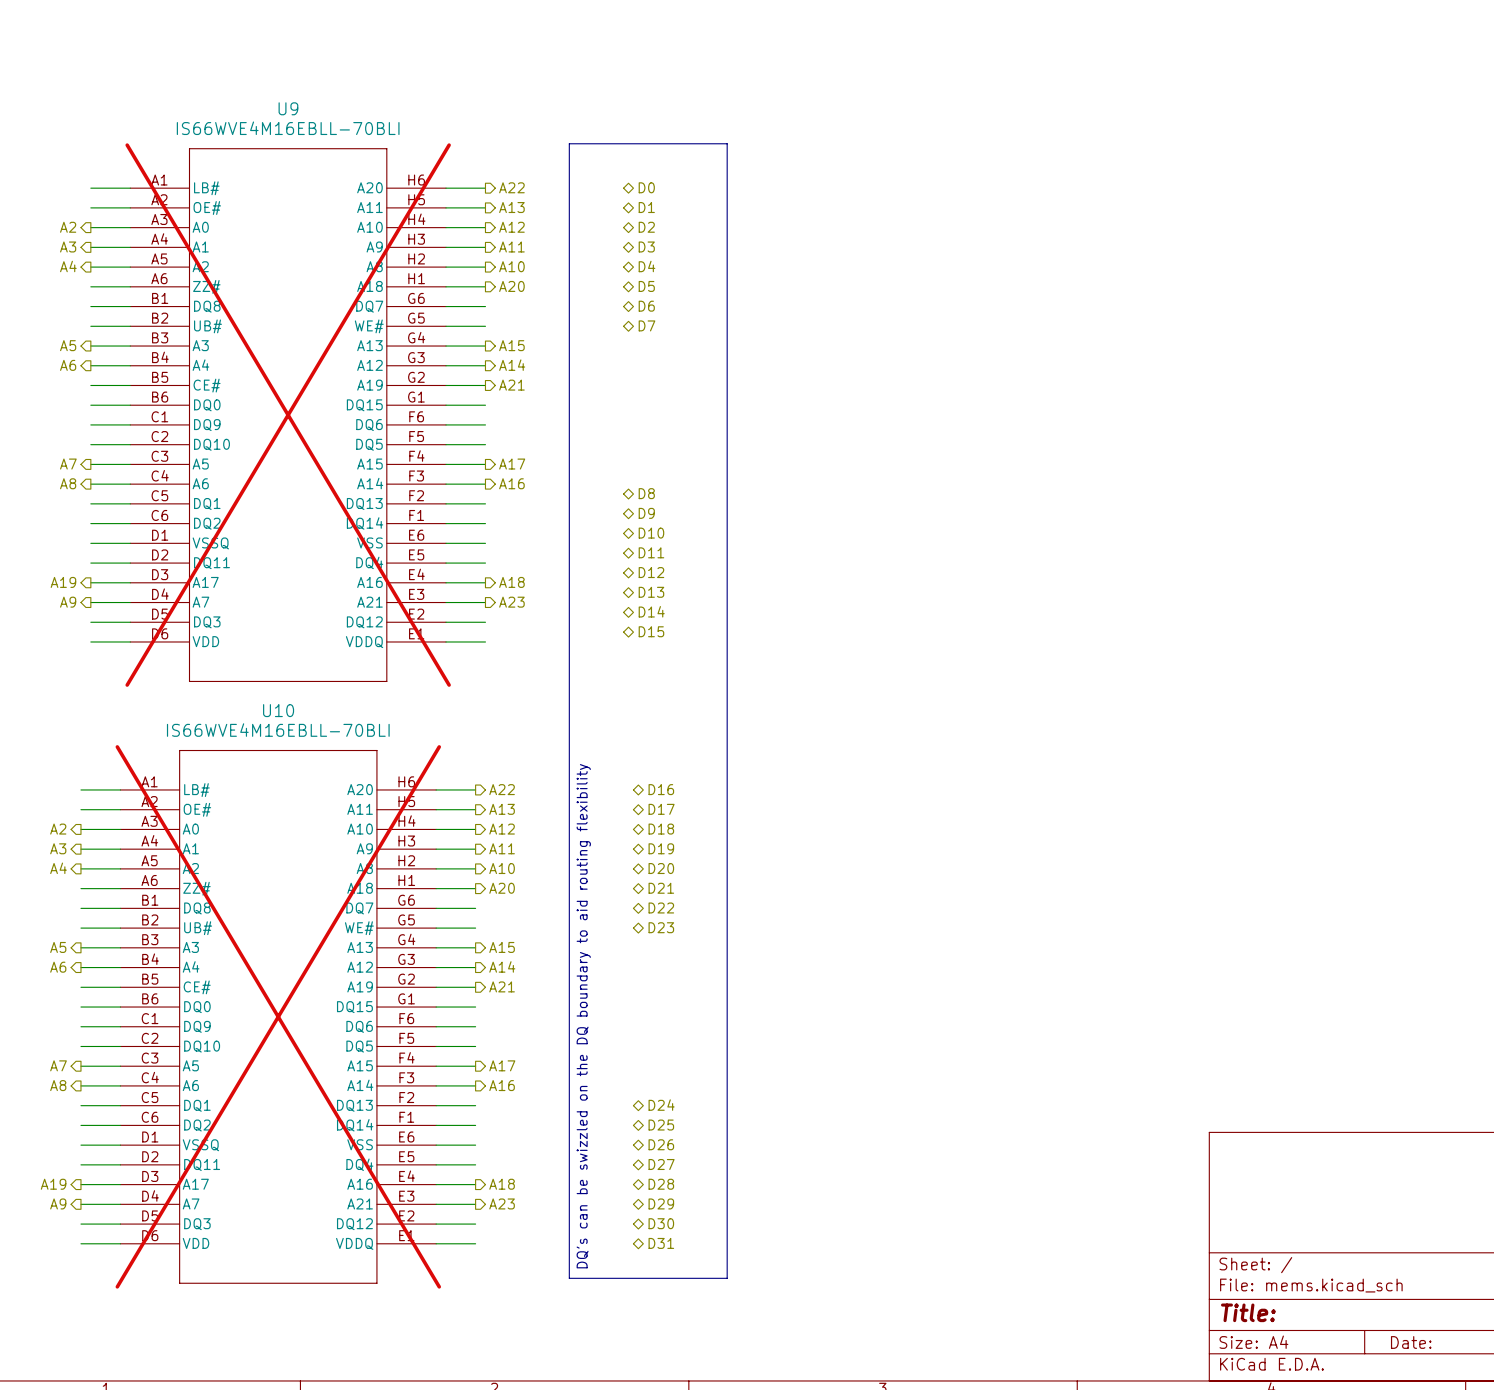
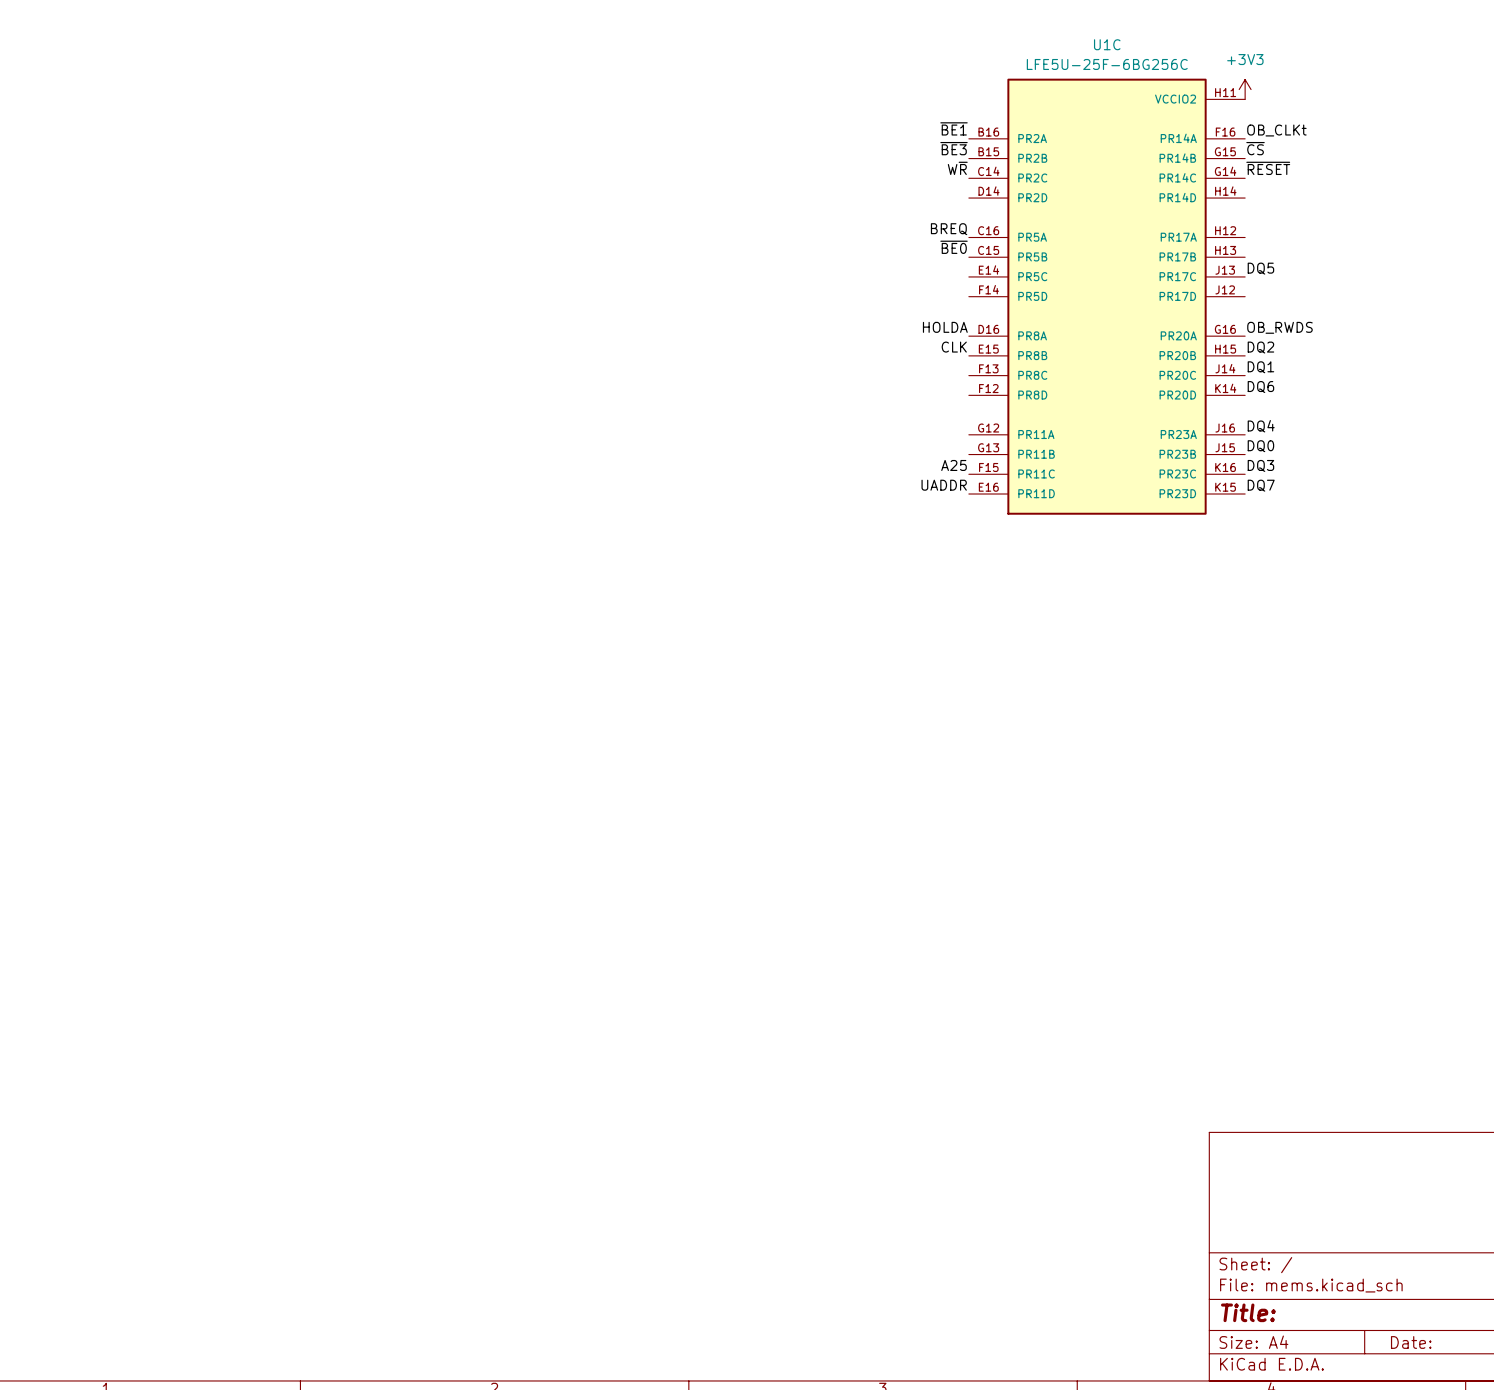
power symbol: none -> +3V3 (1245, 89)
label: none -> ~{BE1} (954, 128)
label: none -> OB_CLKt (1276, 130)
line: (569, 143) (727, 143) (727, 1278) (569, 1278) (569, 143) -> none
label: none -> ~{BE3} (954, 148)
label: none -> ~{CS} (1255, 148)
label: none -> W~{R} (957, 168)
label: none -> ~{RESET} (1268, 168)
hierarchical label: A22 (511, 187) -> none
hierarchical label: D0 (646, 187) -> none
wire: (90, 188) (130, 188) -> none
wire: (446, 188) (485, 188) -> none
wire: (90, 207) (130, 207) -> none
wire: (446, 207) (485, 207) -> none
hierarchical label: A13 (511, 207) -> none
hierarchical label: D1 (646, 207) -> none
hierarchical label: A2 (68, 227) -> none
wire: (90, 227) (130, 227) -> none
wire: (446, 227) (485, 227) -> none
hierarchical label: A12 (511, 227) -> none
hierarchical label: D2 (646, 227) -> none
label: none -> BREQ (949, 229)
hierarchical label: A3 (68, 246) -> none
hierarchical label: A11 (511, 246) -> none
hierarchical label: D3 (646, 246) -> none
wire: (90, 247) (130, 247) -> none
wire: (446, 247) (485, 247) -> none
label: none -> ~{BE0} (954, 247)
hierarchical label: A4 (68, 266) -> none
hierarchical label: A10 (511, 266) -> none
hierarchical label: D4 (647, 266) -> none
wire: (90, 267) (130, 267) -> none
wire: (446, 267) (485, 267) -> none
label: none -> DQ5 (1260, 268)
wire: (90, 286) (130, 286) -> none
wire: (446, 286) (485, 286) -> none
hierarchical label: A20 (511, 286) -> none
hierarchical label: D5 (646, 286) -> none
U1C: none -> LFE5U-25F-6BG256C (1107, 296)
wire: (90, 306) (130, 306) -> none
wire: (446, 306) (485, 306) -> none
hierarchical label: D6 (646, 306) -> none
hierarchical label: D7 (647, 325) -> none
wire: (90, 326) (130, 326) -> none
wire: (446, 326) (485, 326) -> none
label: none -> HOLDA (945, 327)
label: none -> OB_RWDS (1279, 327)
hierarchical label: A5 (68, 345) -> none
hierarchical label: A15 (511, 345) -> none
wire: (90, 346) (130, 346) -> none
wire: (446, 346) (485, 346) -> none
label: none -> CLK (954, 347)
label: none -> DQ2 (1260, 347)
hierarchical label: A6 (68, 365) -> none
wire: (90, 365) (130, 365) -> none
wire: (446, 365) (485, 365) -> none
hierarchical label: A14 (512, 365) -> none
label: none -> DQ1 (1260, 367)
wire: (90, 385) (130, 385) -> none
wire: (446, 385) (485, 385) -> none
hierarchical label: A21 (511, 385) -> none
label: none -> DQ6 (1260, 387)
wire: (90, 405) (130, 405) -> none
wire: (446, 405) (485, 405) -> none
U9: IS66WVE4M16EBLL-70BLI (288, 415) -> none
wire: (90, 424) (130, 424) -> none
wire: (446, 424) (485, 424) -> none
label: none -> DQ4 (1261, 426)
wire: (90, 444) (130, 444) -> none
wire: (446, 444) (485, 444) -> none
label: none -> DQ0 (1260, 446)
hierarchical label: A7 (68, 464) -> none
wire: (90, 464) (130, 464) -> none
wire: (446, 464) (485, 464) -> none
hierarchical label: A17 (512, 464) -> none
label: none -> A25 (954, 465)
label: none -> DQ3 (1260, 465)
hierarchical label: A8 (68, 483) -> none
hierarchical label: A16 (511, 483) -> none
wire: (90, 484) (130, 484) -> none
wire: (446, 484) (485, 484) -> none
label: none -> UADDR (944, 485)
label: none -> DQ7 (1261, 485)
hierarchical label: D8 (646, 493) -> none
wire: (90, 503) (130, 503) -> none
wire: (446, 503) (485, 503) -> none
hierarchical label: D9 (646, 513) -> none
wire: (90, 523) (130, 523) -> none
wire: (446, 523) (485, 523) -> none
hierarchical label: D10 (651, 533) -> none
wire: (90, 543) (130, 543) -> none
wire: (446, 543) (485, 543) -> none
hierarchical label: D11 (651, 552) -> none
wire: (90, 563) (130, 563) -> none
wire: (446, 563) (485, 563) -> none
hierarchical label: D12 (651, 572) -> none
hierarchical label: A19 (63, 582) -> none
wire: (90, 582) (130, 582) -> none
wire: (446, 582) (485, 582) -> none
hierarchical label: A18 (511, 582) -> none
hierarchical label: D13 (651, 592) -> none
hierarchical label: A9 (68, 602) -> none
wire: (90, 602) (130, 602) -> none
wire: (446, 602) (485, 602) -> none
hierarchical label: A23 (511, 602) -> none
hierarchical label: D14 (651, 611) -> none
wire: (90, 622) (130, 622) -> none
wire: (446, 622) (485, 622) -> none
hierarchical label: D15 (651, 631) -> none
wire: (90, 641) (130, 641) -> none
wire: (446, 641) (485, 641) -> none
wire: (80, 789) (120, 789) -> none
wire: (436, 789) (475, 789) -> none
hierarchical label: A22 (502, 789) -> none
hierarchical label: D16 (661, 789) -> none
wire: (80, 809) (120, 809) -> none
wire: (436, 809) (475, 809) -> none
hierarchical label: A13 (502, 809) -> none
hierarchical label: D17 (661, 809) -> none
hierarchical label: A2 (58, 829) -> none
wire: (80, 829) (120, 829) -> none
wire: (436, 829) (475, 829) -> none
hierarchical label: A12 (502, 829) -> none
hierarchical label: D18 (661, 829) -> none
hierarchical label: A3 (58, 848) -> none
hierarchical label: A11 (502, 848) -> none
hierarchical label: D19 (661, 848) -> none
wire: (80, 849) (120, 849) -> none
wire: (436, 849) (475, 849) -> none
hierarchical label: A4 (58, 868) -> none
wire: (80, 868) (120, 868) -> none
wire: (436, 868) (475, 868) -> none
hierarchical label: A10 (502, 868) -> none
hierarchical label: D20 (661, 868) -> none
wire: (80, 888) (120, 888) -> none
wire: (436, 888) (475, 888) -> none
hierarchical label: A20 (502, 888) -> none
hierarchical label: D21 (661, 888) -> none
hierarchical label: D22 (661, 907) -> none
wire: (80, 908) (120, 908) -> none
wire: (436, 908) (475, 908) -> none
hierarchical label: D23 (661, 927) -> none
wire: (80, 928) (120, 928) -> none
wire: (436, 928) (475, 928) -> none
hierarchical label: A5 (58, 947) -> none
wire: (80, 947) (120, 947) -> none
wire: (436, 947) (475, 947) -> none
hierarchical label: A15 (502, 947) -> none
hierarchical label: A14 (502, 966) -> none
hierarchical label: A6 (58, 967) -> none
wire: (80, 967) (120, 967) -> none
wire: (436, 967) (475, 967) -> none
hierarchical label: A21 (502, 986) -> none
wire: (80, 987) (120, 987) -> none
wire: (436, 987) (475, 987) -> none
wire: (80, 1007) (120, 1007) -> none
wire: (436, 1007) (475, 1007) -> none
U10: IS66WVE4M16EBLL-70BLI (278, 1016) -> none
text: DQ's can be swizzled on the DQ boundary to aid routing flexibility (583, 1016) -> none
wire: (80, 1026) (120, 1026) -> none
wire: (436, 1026) (475, 1026) -> none
wire: (80, 1046) (120, 1046) -> none
wire: (436, 1046) (475, 1046) -> none
hierarchical label: A7 (58, 1065) -> none
hierarchical label: A17 (502, 1065) -> none
wire: (80, 1066) (120, 1066) -> none
wire: (436, 1066) (475, 1066) -> none
hierarchical label: A8 (58, 1085) -> none
wire: (80, 1085) (120, 1085) -> none
wire: (436, 1085) (475, 1085) -> none
hierarchical label: A16 (502, 1085) -> none
wire: (80, 1105) (120, 1105) -> none
wire: (436, 1105) (475, 1105) -> none
hierarchical label: D24 (661, 1105) -> none
wire: (80, 1125) (120, 1125) -> none
wire: (436, 1125) (475, 1125) -> none
hierarchical label: D25 (661, 1125) -> none
hierarchical label: D26 (661, 1144) -> none
wire: (80, 1145) (120, 1145) -> none
wire: (436, 1145) (475, 1145) -> none
wire: (80, 1164) (120, 1164) -> none
wire: (436, 1164) (475, 1164) -> none
hierarchical label: D27 (661, 1164) -> none
hierarchical label: A19 (53, 1184) -> none
wire: (80, 1184) (120, 1184) -> none
wire: (436, 1184) (475, 1184) -> none
hierarchical label: A18 (502, 1184) -> none
hierarchical label: D28 (661, 1184) -> none
hierarchical label: A9 (58, 1203) -> none
hierarchical label: A23 (502, 1203) -> none
hierarchical label: D29 (661, 1203) -> none
wire: (80, 1204) (120, 1204) -> none
wire: (436, 1204) (475, 1204) -> none
hierarchical label: D30 (661, 1223) -> none
wire: (80, 1224) (120, 1224) -> none
wire: (436, 1224) (475, 1224) -> none
wire: (80, 1243) (120, 1243) -> none
wire: (436, 1243) (475, 1243) -> none
hierarchical label: D31 (661, 1243) -> none

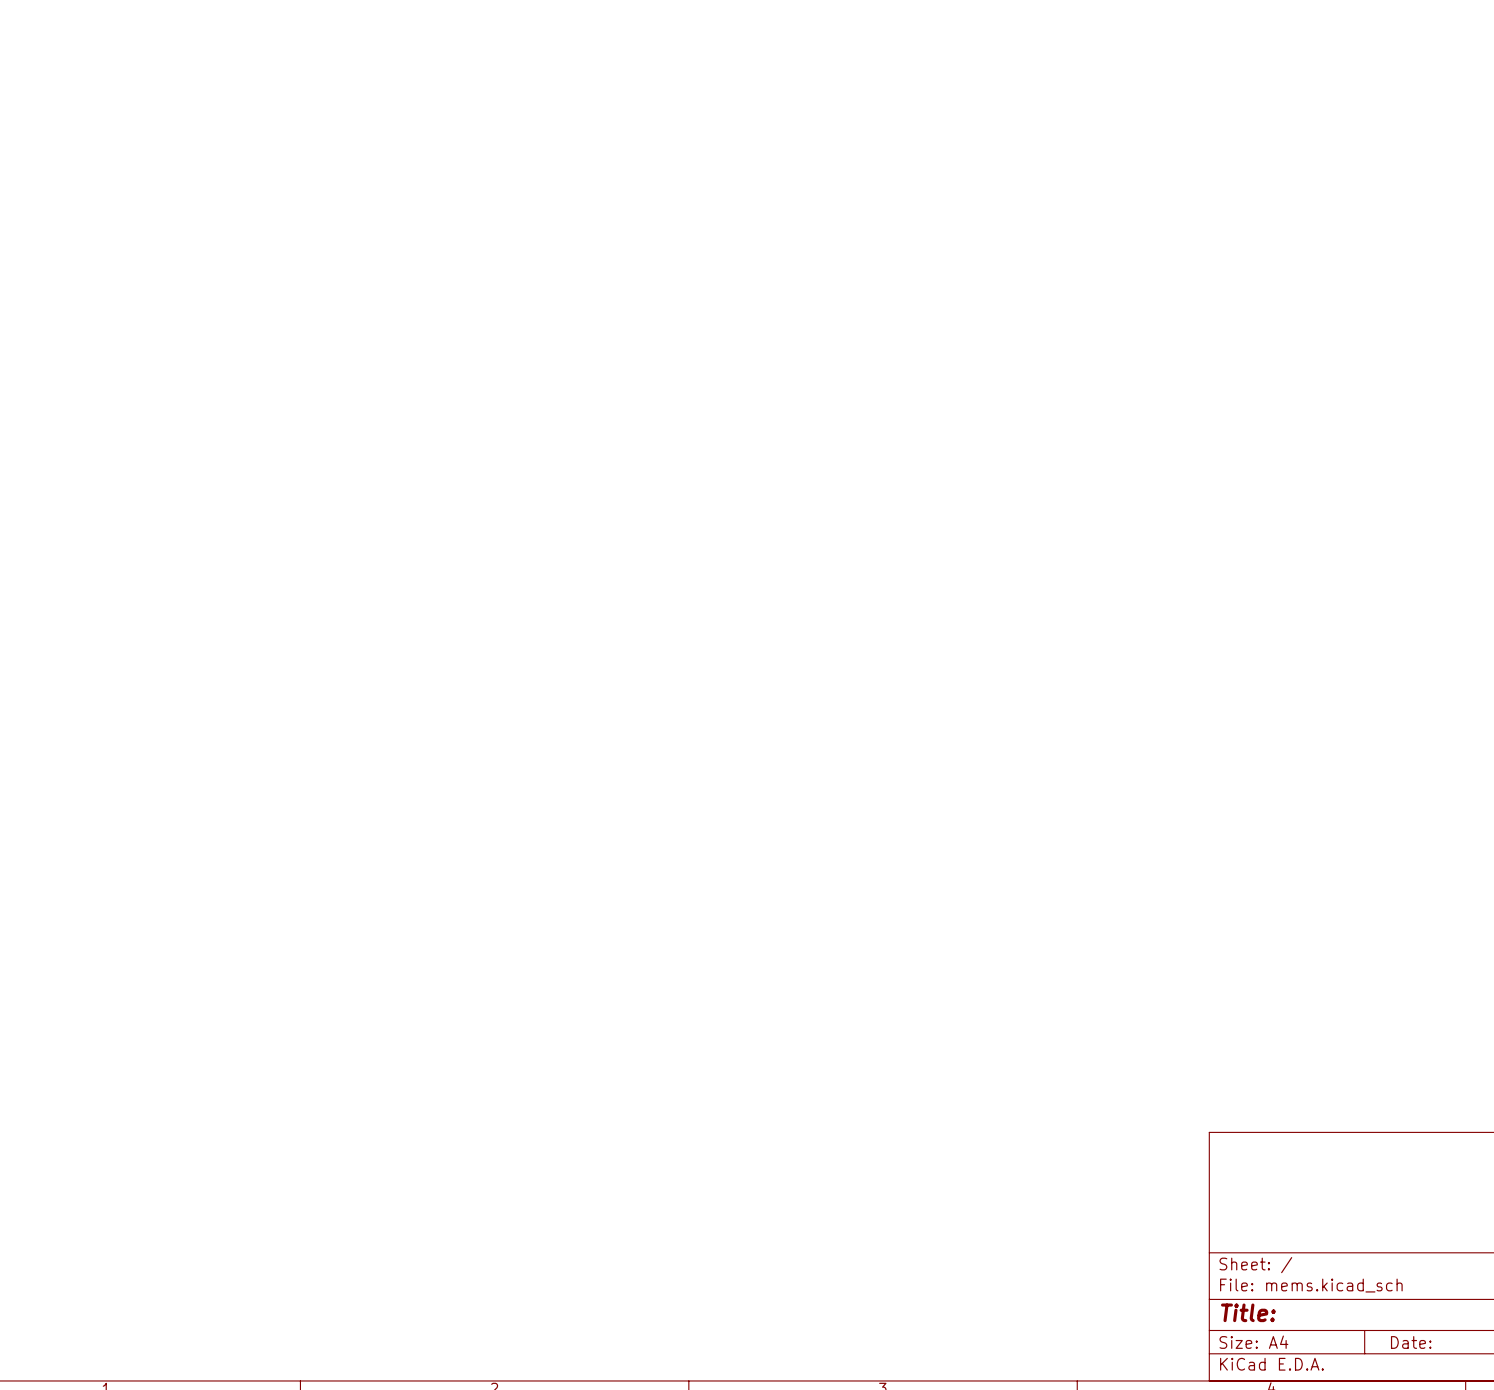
power symbol: +3V3 (1245, 89) -> none
label: ~{BE1} (954, 128) -> none
label: OB_CLKt (1276, 130) -> none
label: ~{BE3} (954, 148) -> none
label: ~{CS} (1255, 148) -> none
label: W~{R} (957, 168) -> none
label: ~{RESET} (1268, 168) -> none
label: BREQ (949, 229) -> none
label: ~{BE0} (954, 247) -> none
label: DQ5 (1260, 268) -> none
U1C: LFE5U-25F-6BG256C (1107, 296) -> none
label: HOLDA (945, 327) -> none
label: OB_RWDS (1279, 327) -> none
label: CLK (954, 347) -> none
label: DQ2 (1260, 347) -> none
label: DQ1 (1260, 367) -> none
label: DQ6 (1260, 387) -> none
label: DQ4 (1261, 426) -> none
label: DQ0 (1260, 446) -> none
label: A25 (954, 465) -> none
label: DQ3 (1260, 465) -> none
label: UADDR (944, 485) -> none
label: DQ7 (1261, 485) -> none

